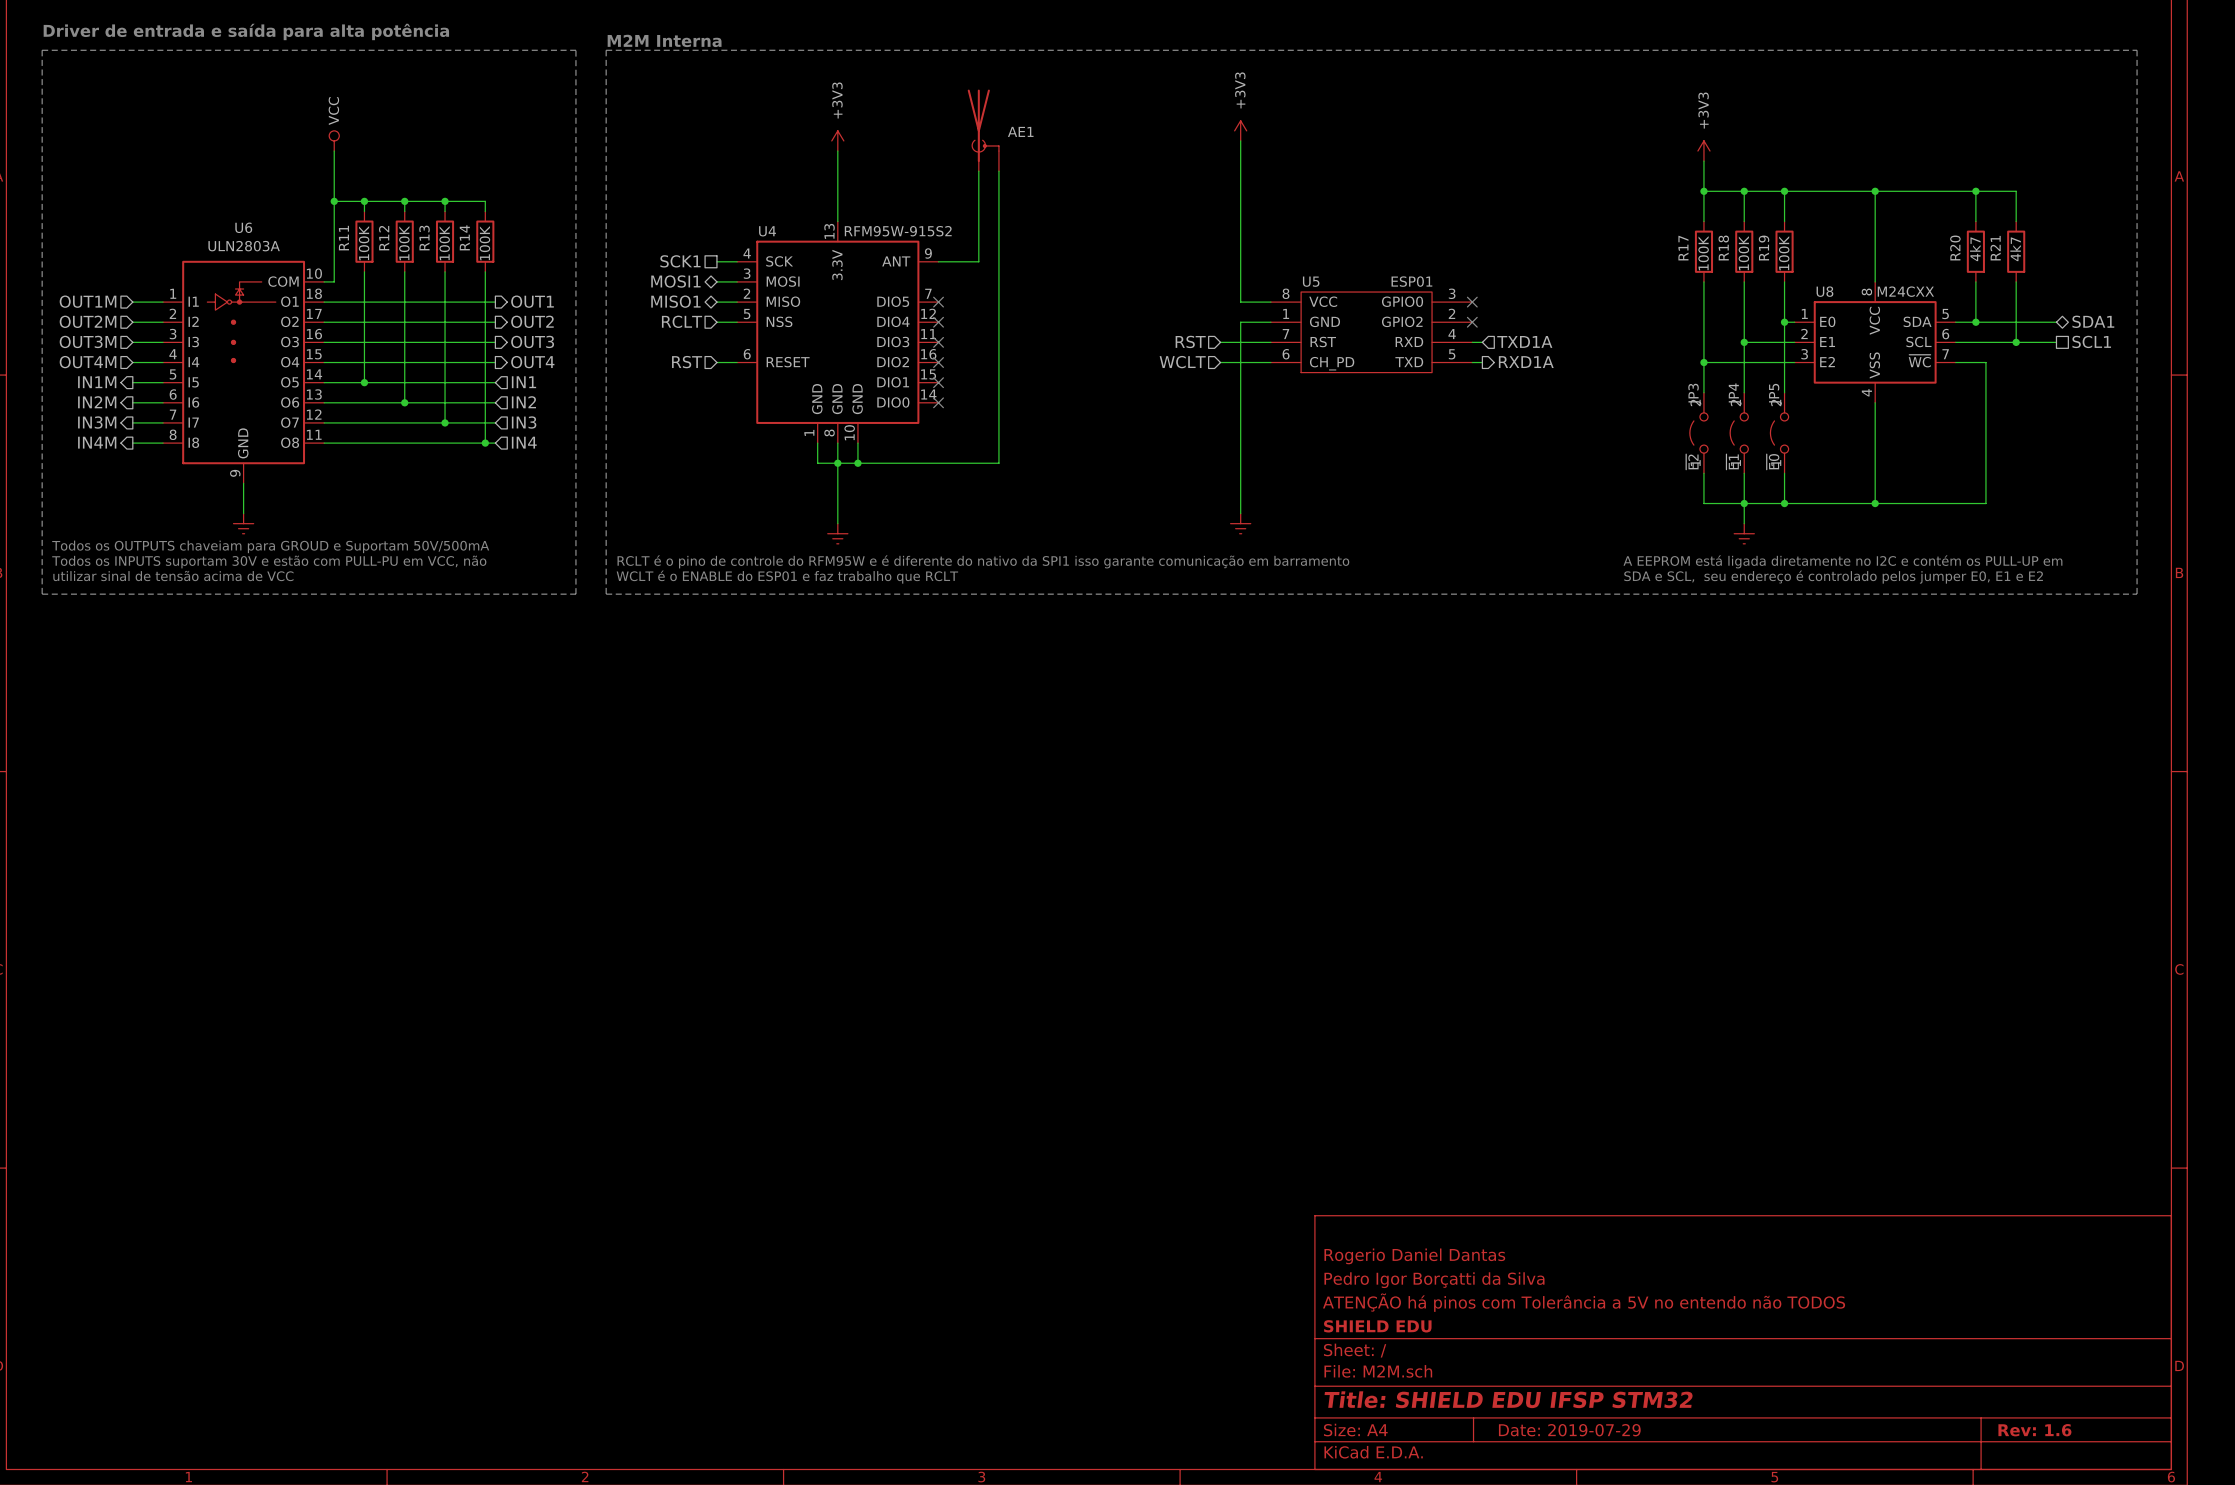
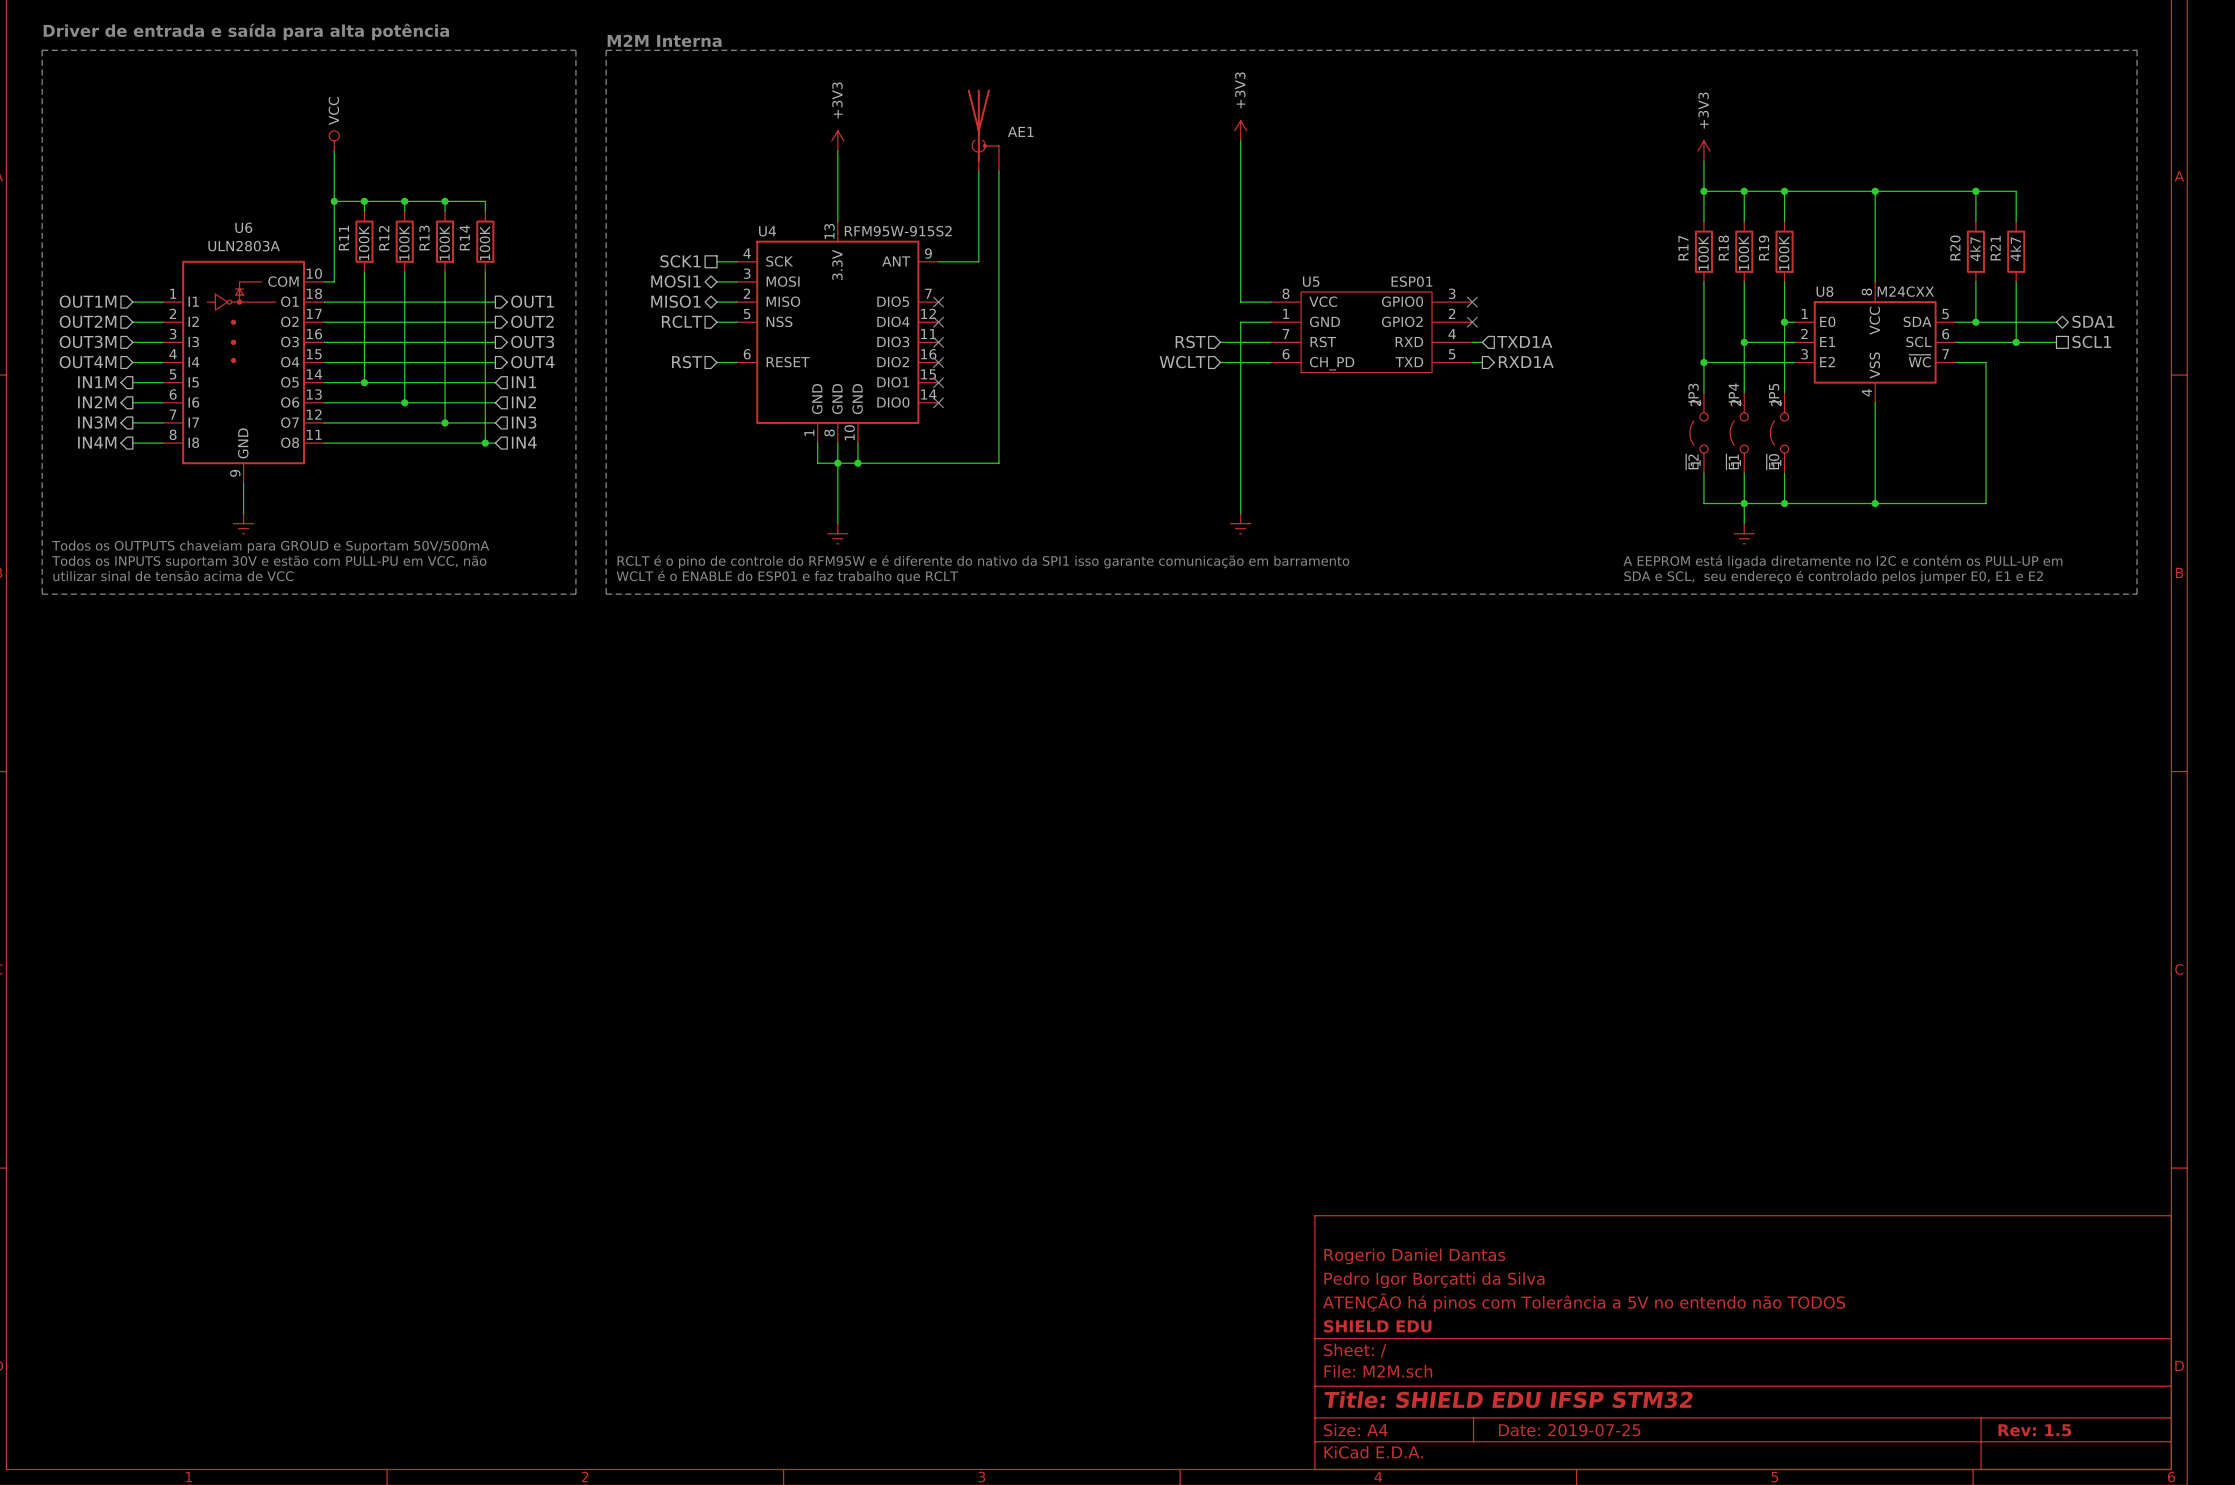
title block: Date: 2019-07-29 (1569, 1430) -> Date: 2019-07-25 (1569, 1430)
title block: Rev: 1.6 (2034, 1430) -> Rev: 1.5 (2034, 1430)

